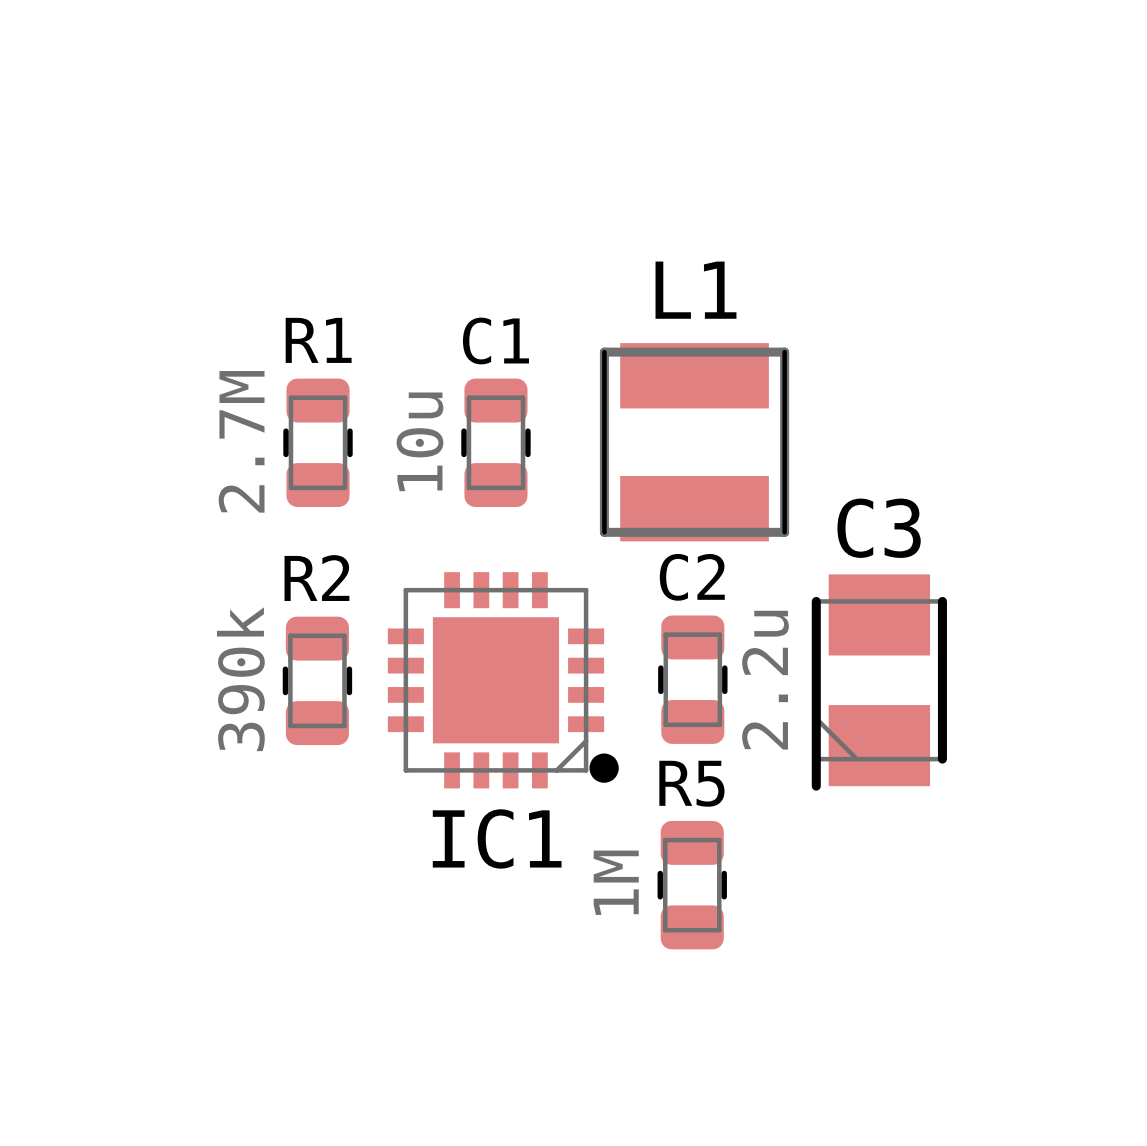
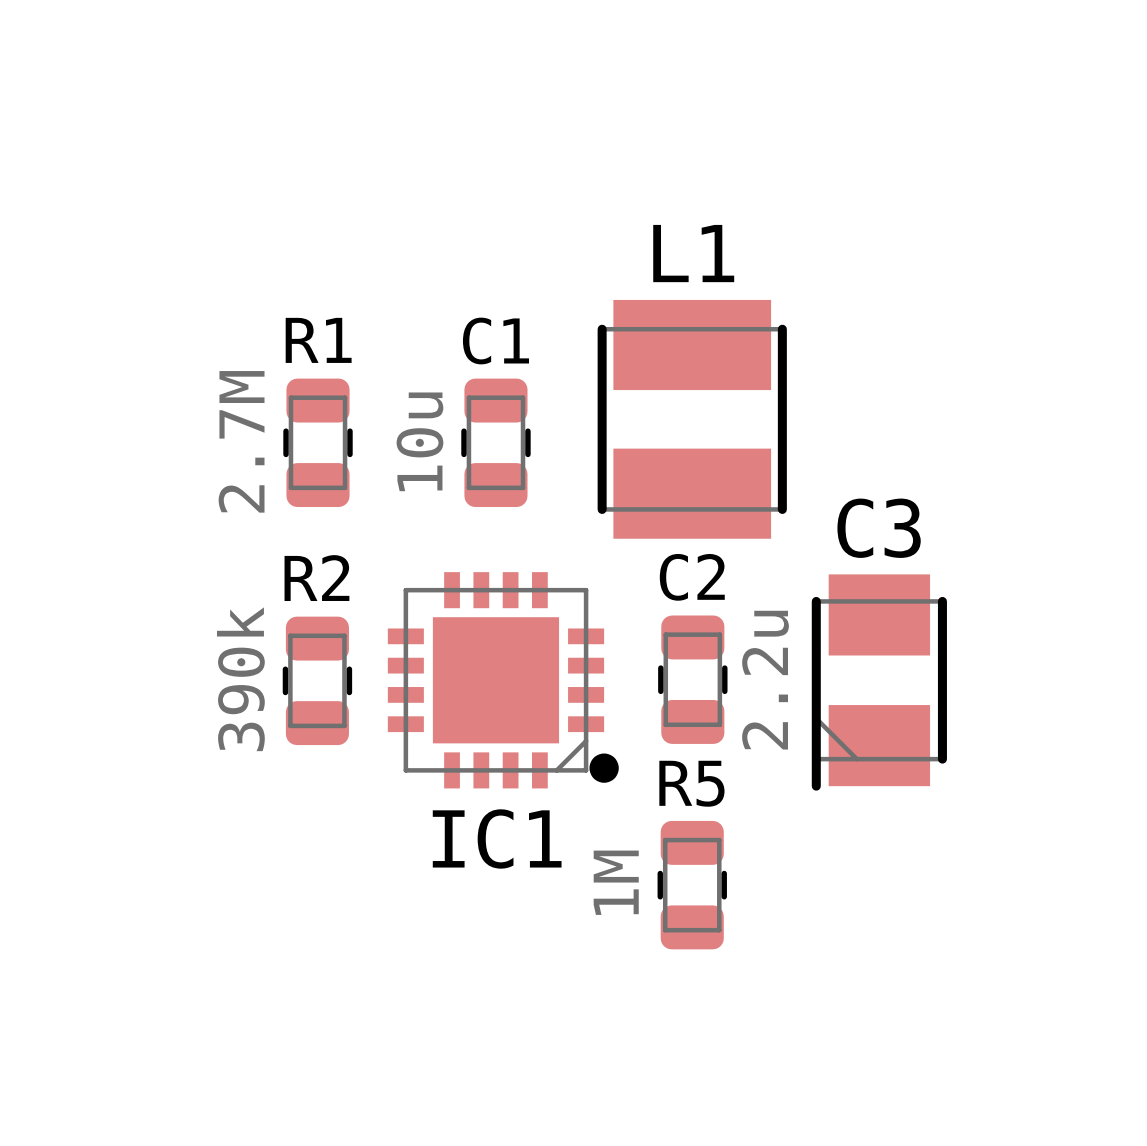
L1 name position: L1 (695, 290) -> L1 (693, 253)
L1 footprint: [599, 343, 790, 542] -> [597, 299, 787, 539]

